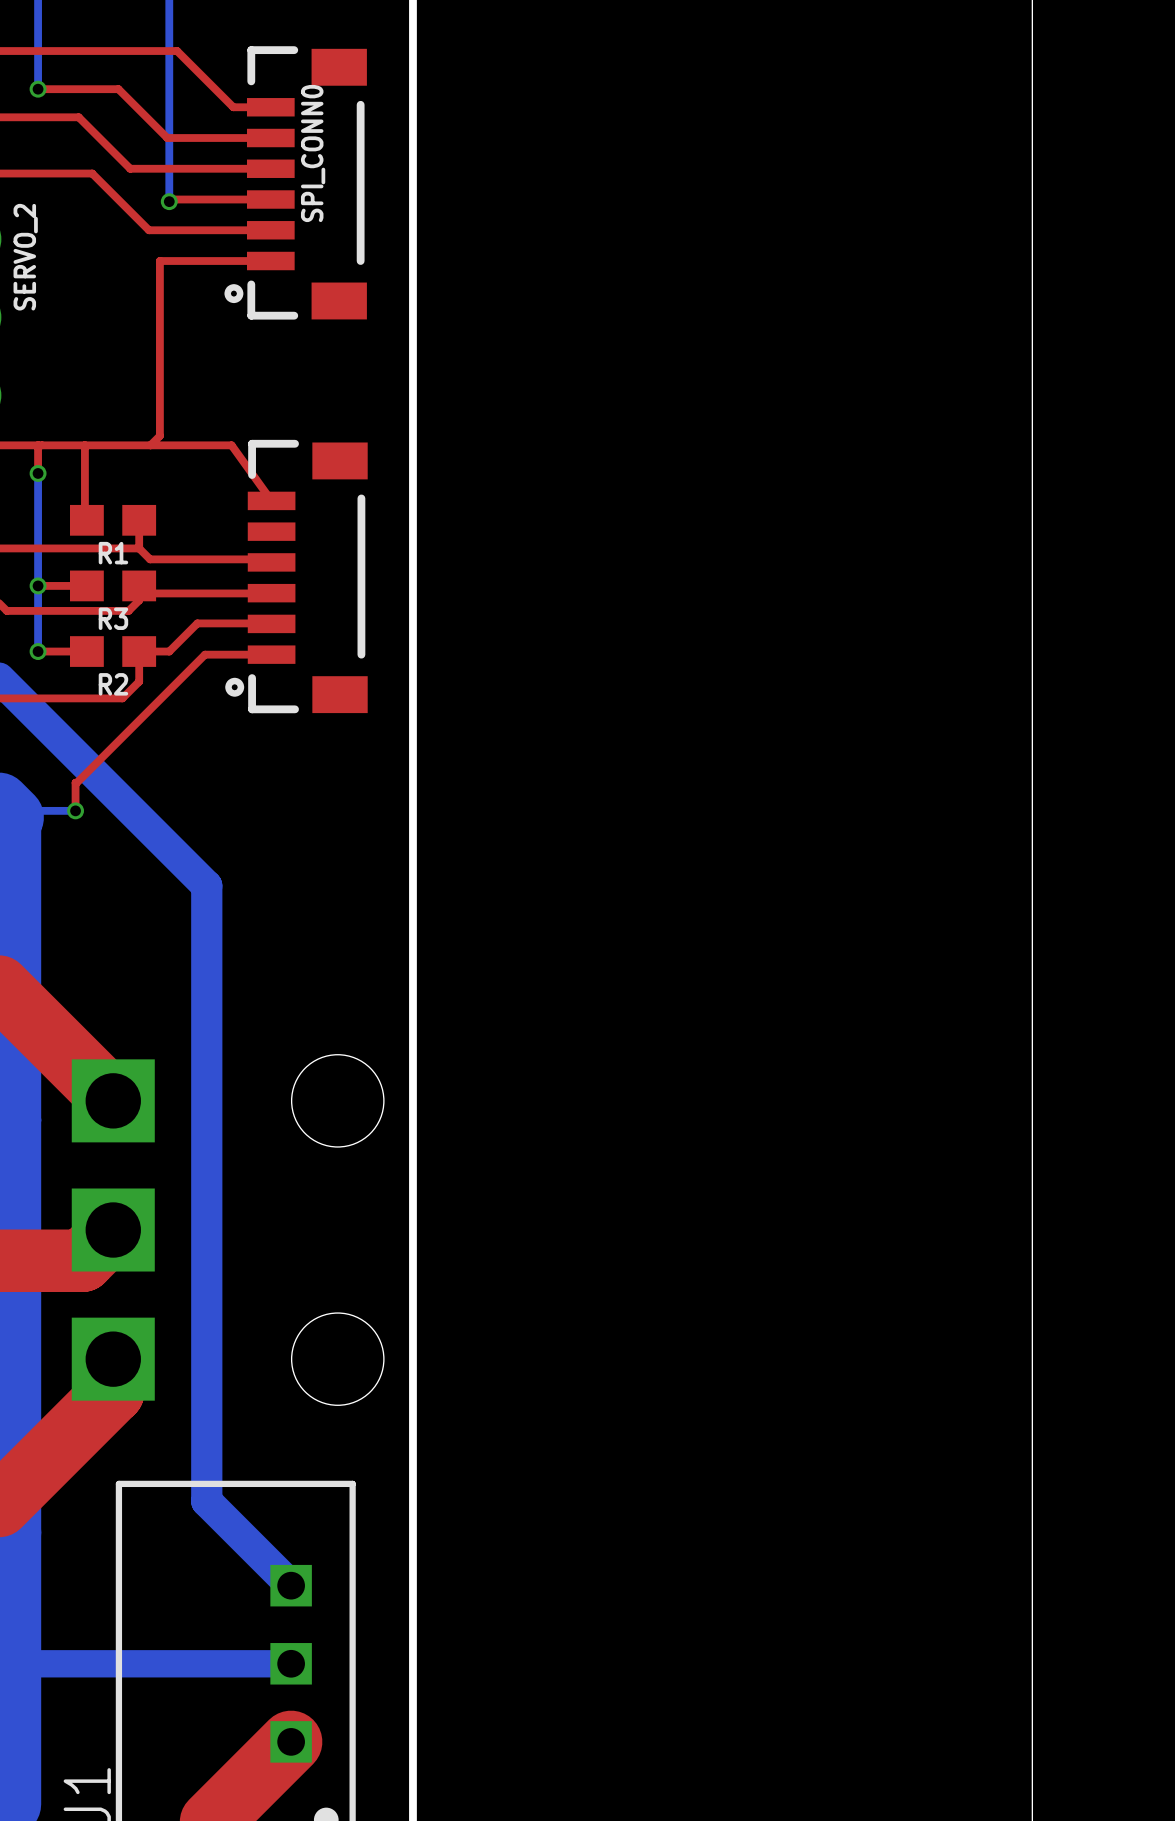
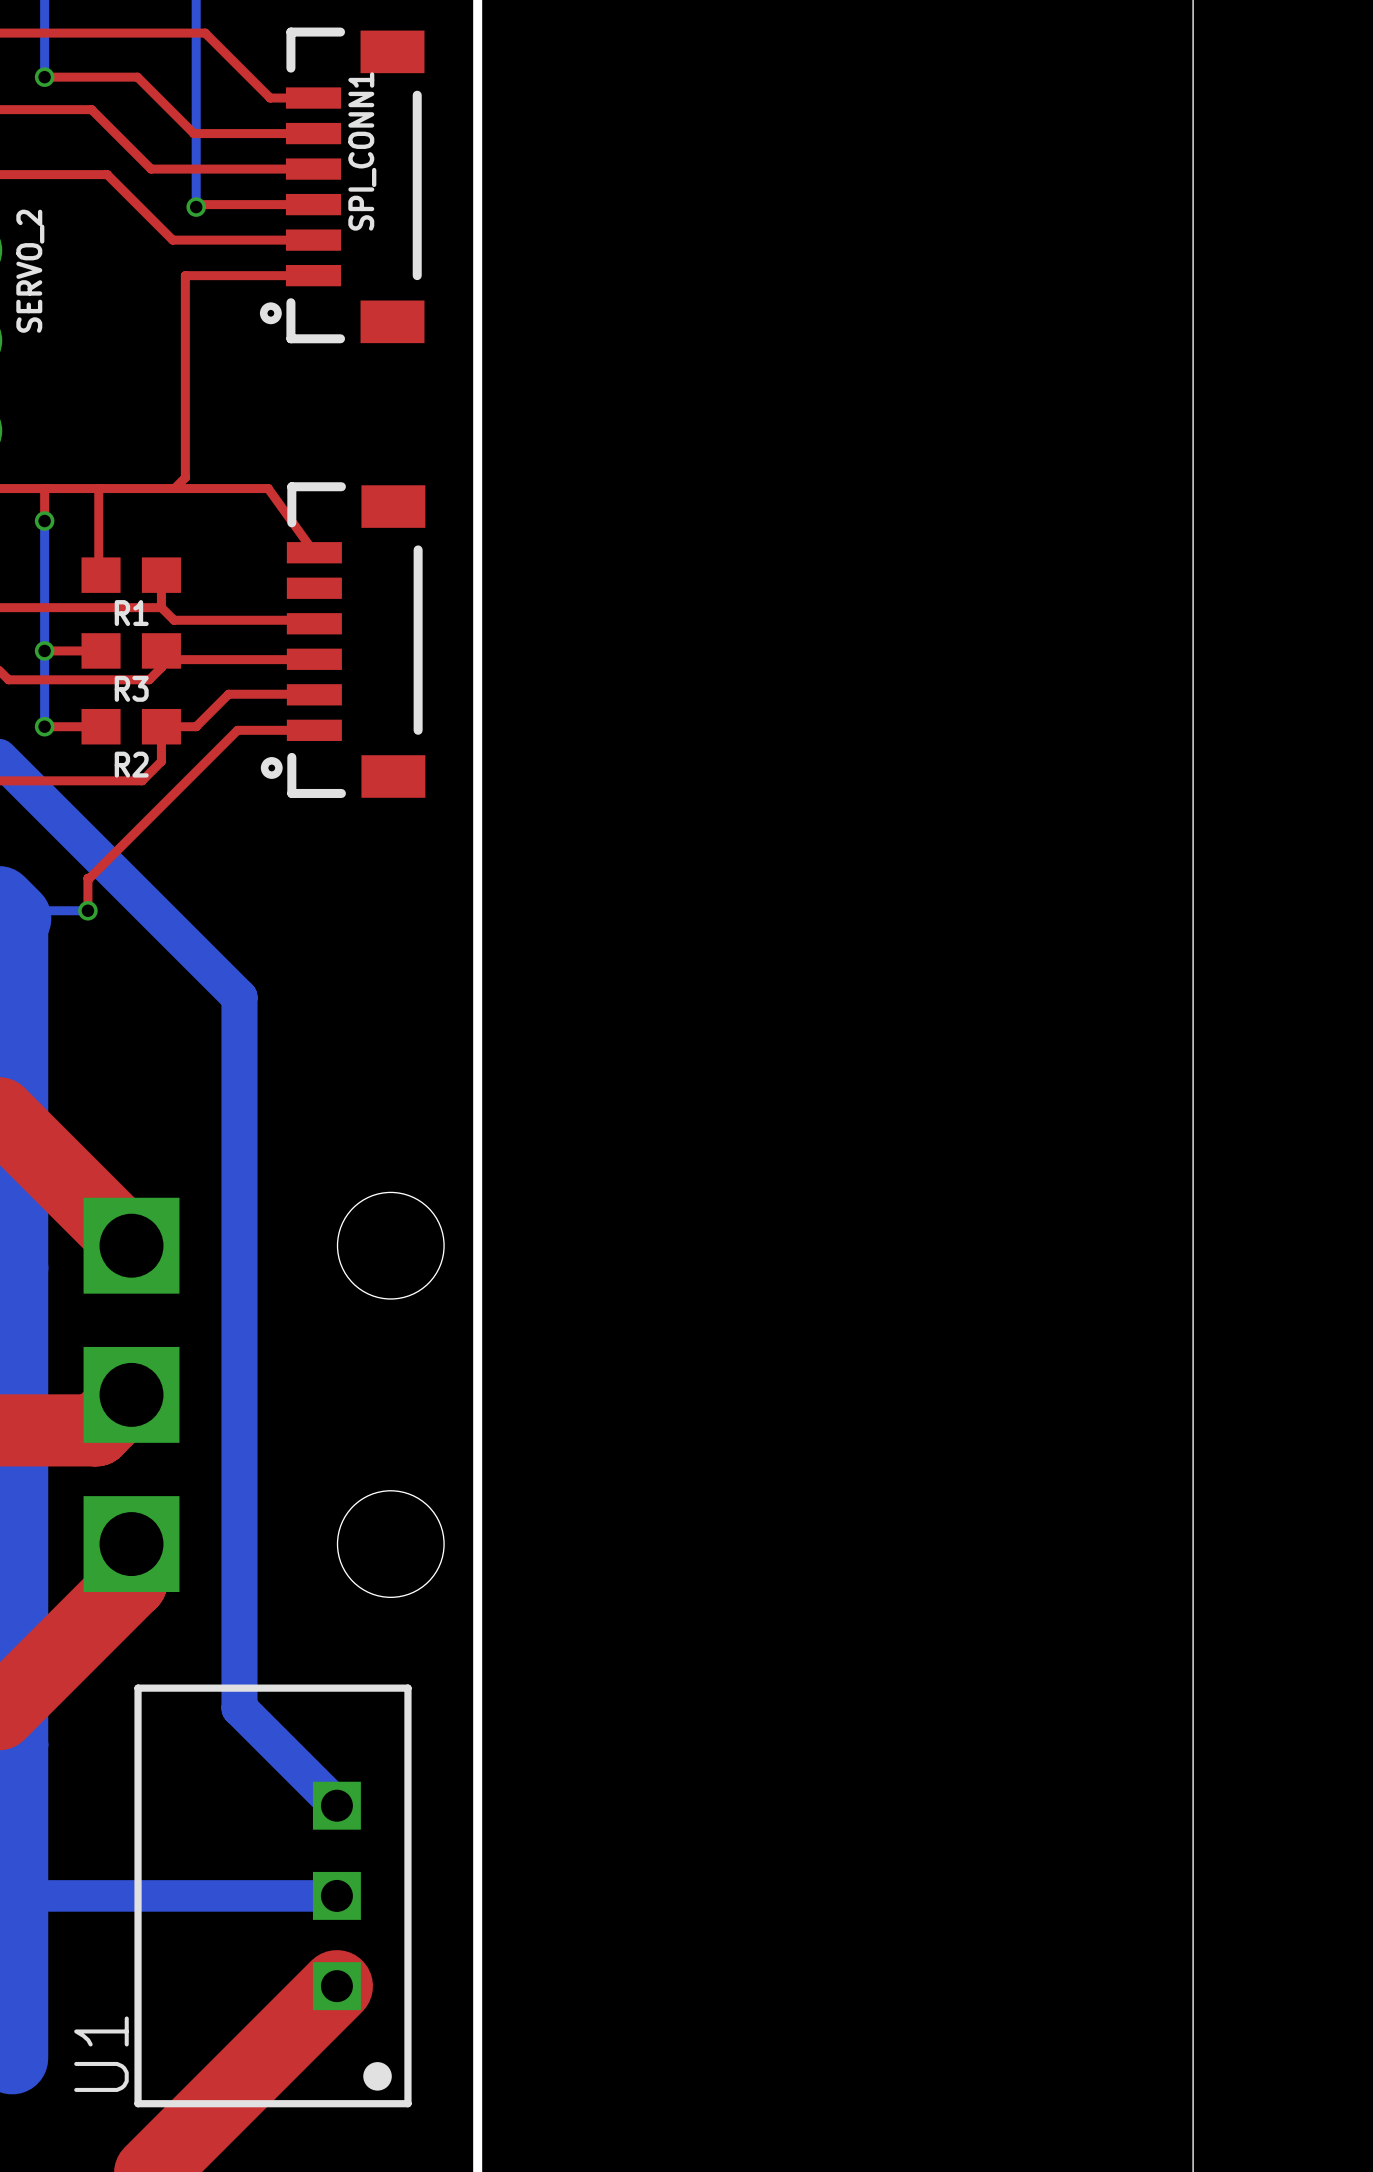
SPI_CONN0 name: SPI_CONN0 (313, 153) -> SPI_CONN1 (362, 151)

